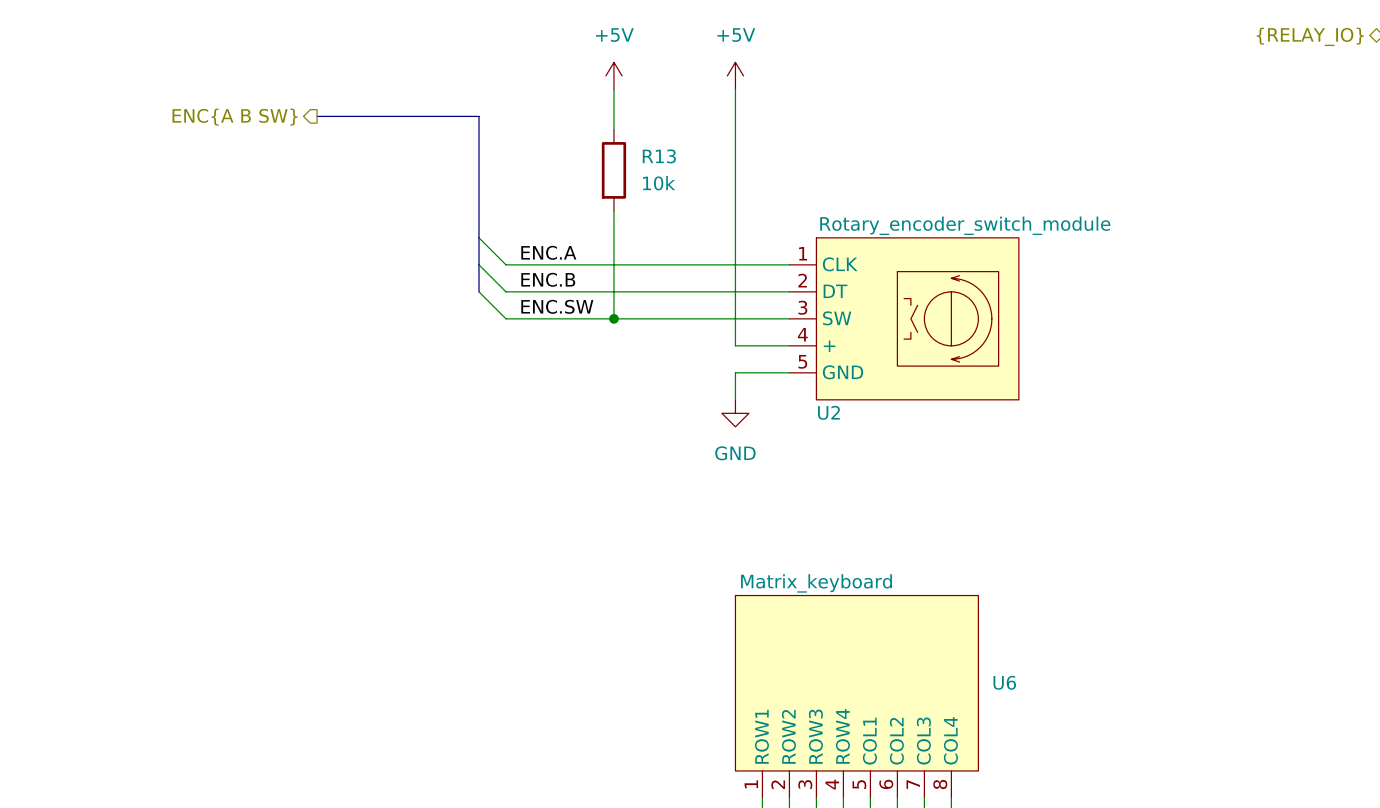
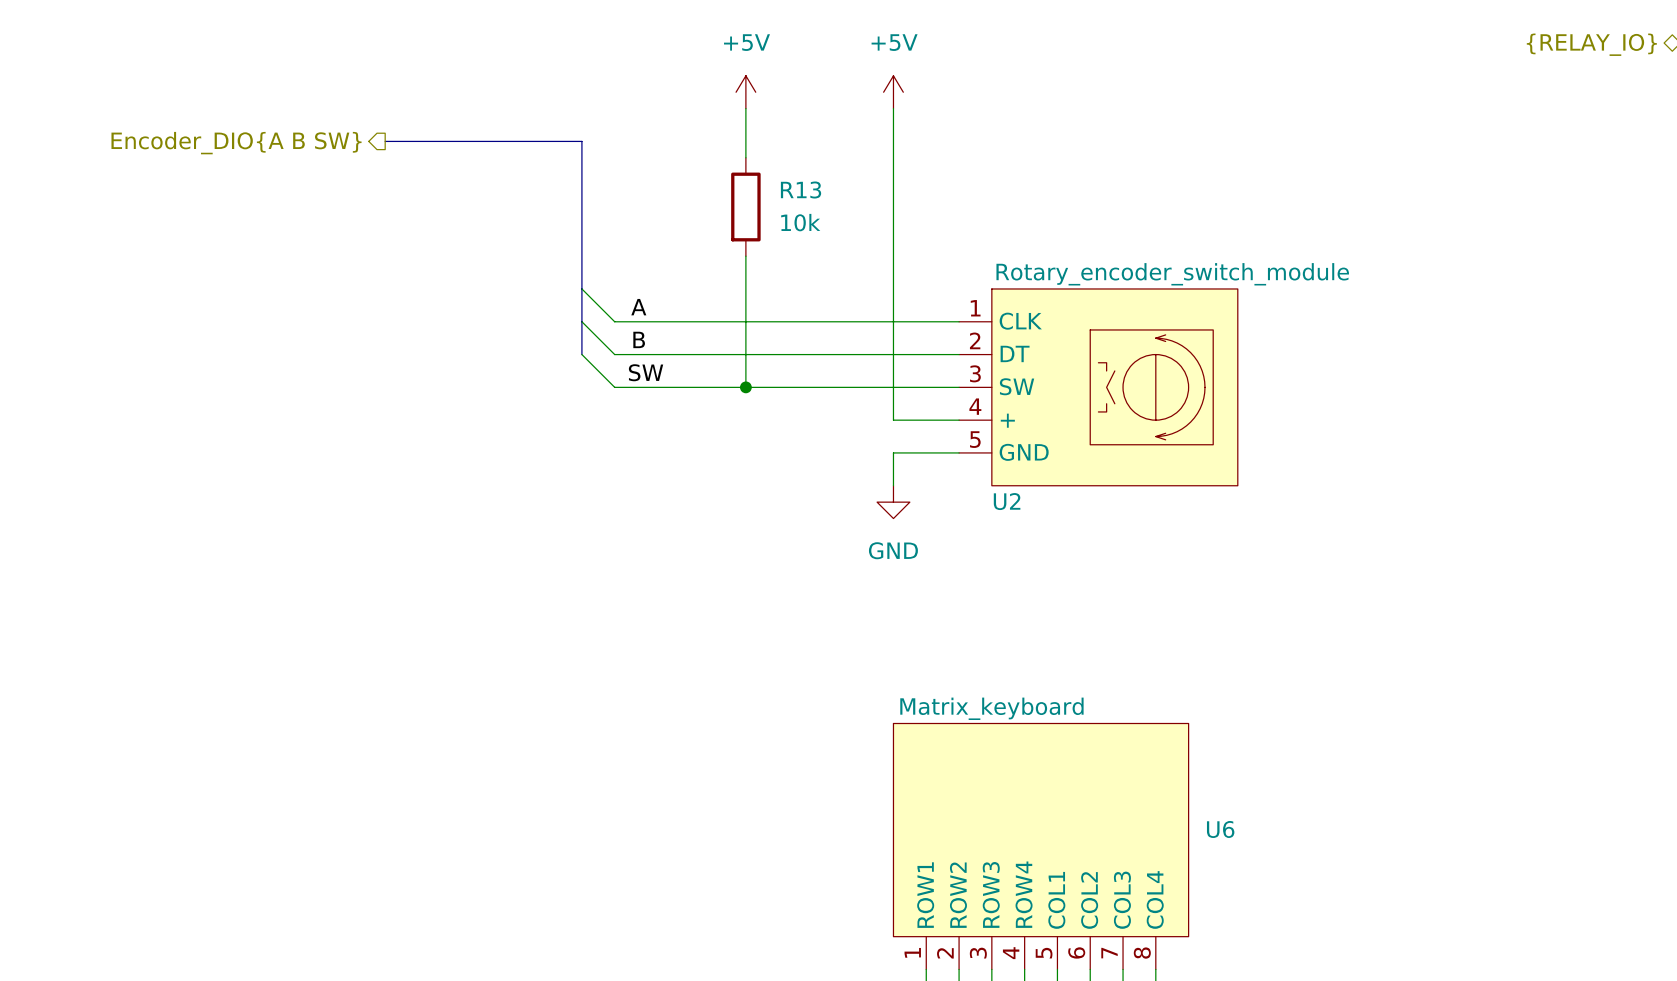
hierarchical label: ENC{A B SW} (235, 117) -> Encoder_DIO{A B SW} (236, 143)
label: ENC.A (548, 252) -> A (638, 307)
label: ENC.B (548, 279) -> B (639, 339)
label: none -> SW (646, 372)
label: ENC.SW (557, 306) -> none

